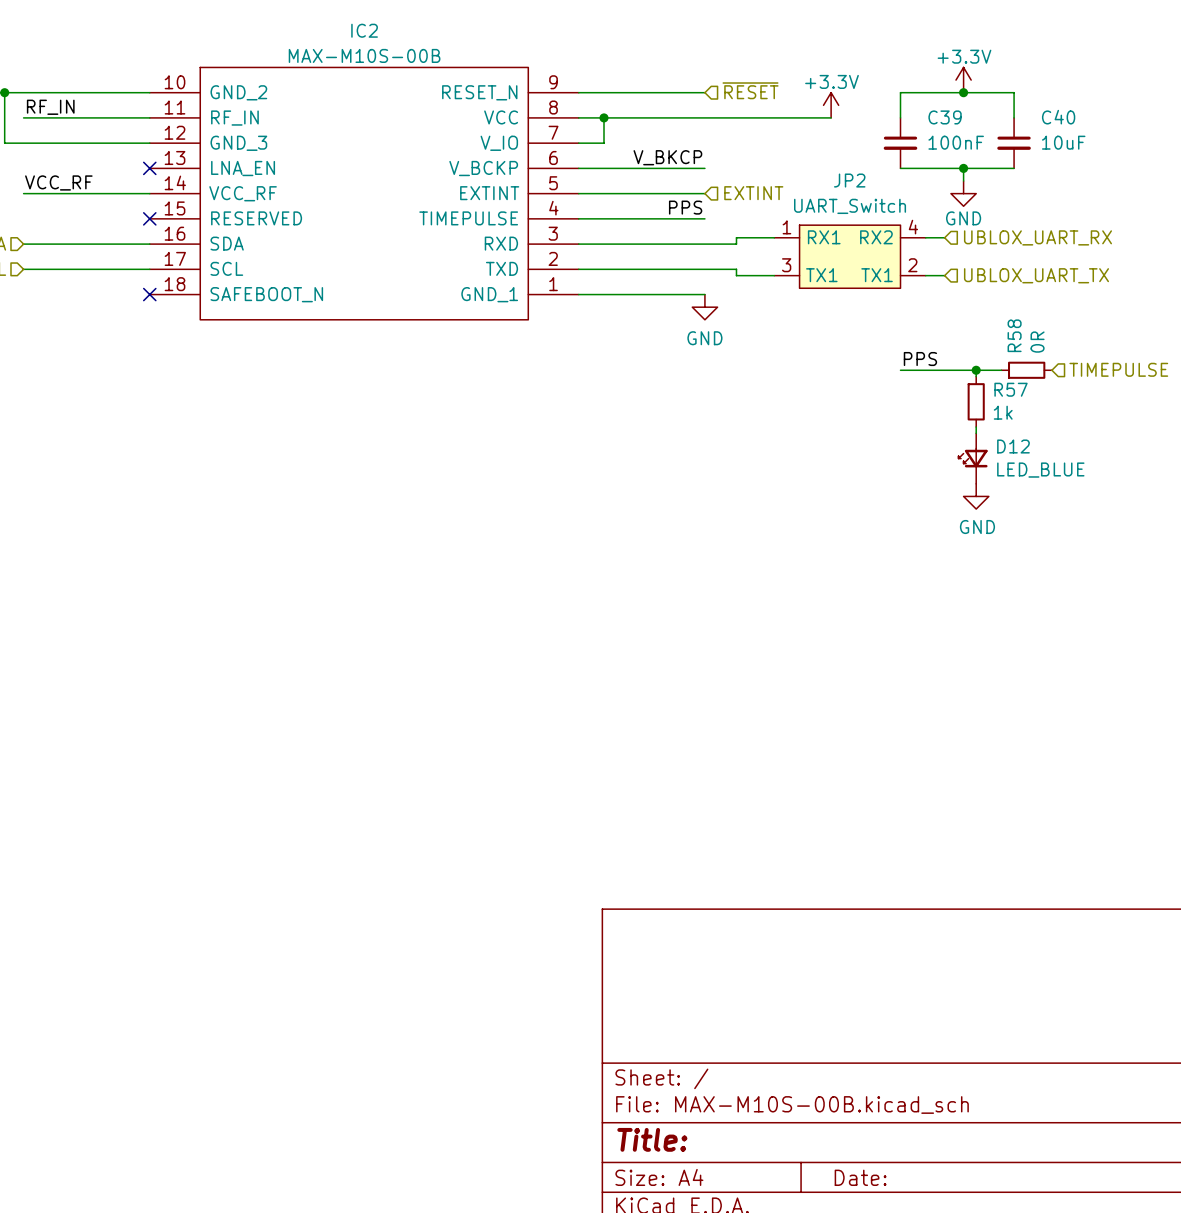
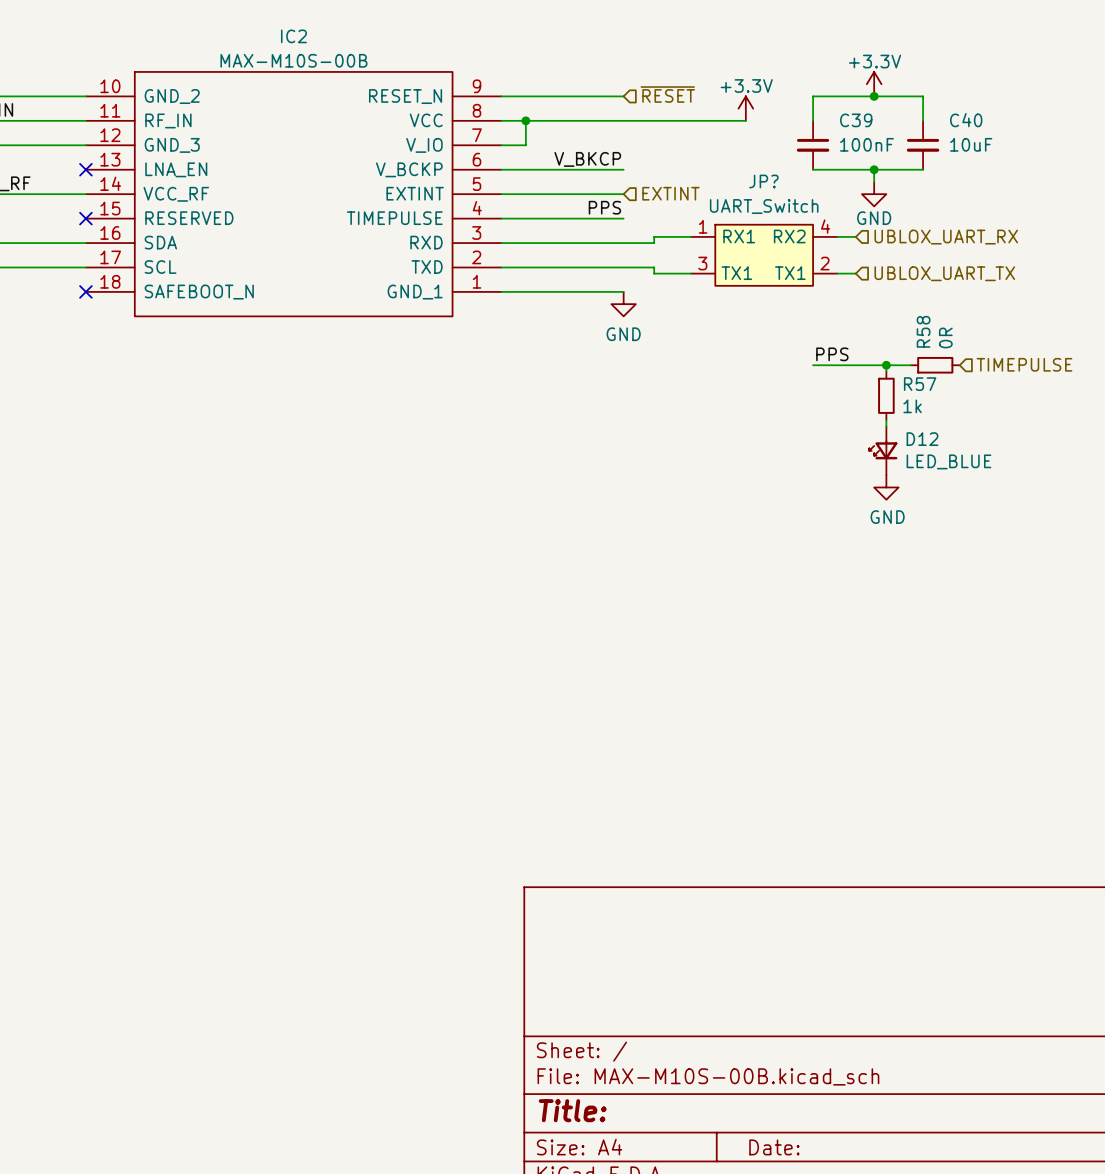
JP2 name: JP2 (849, 180) -> JP? (763, 181)

